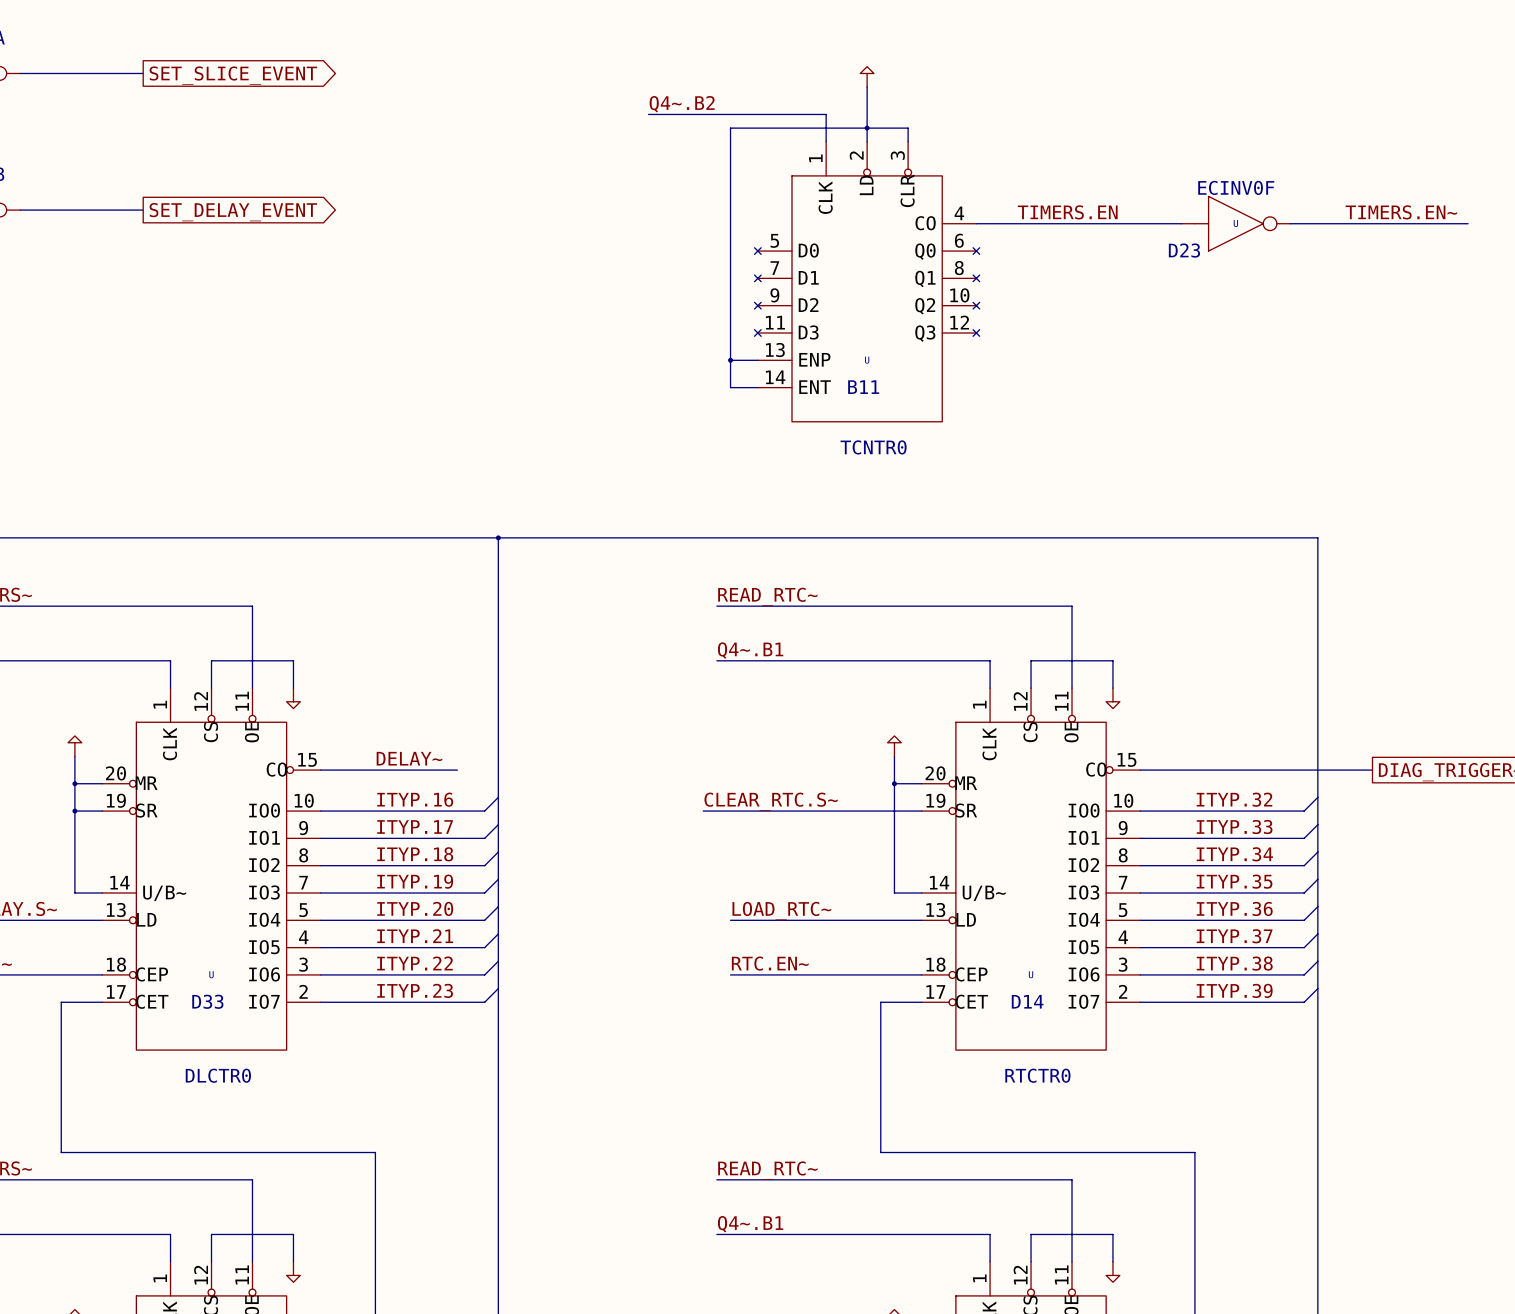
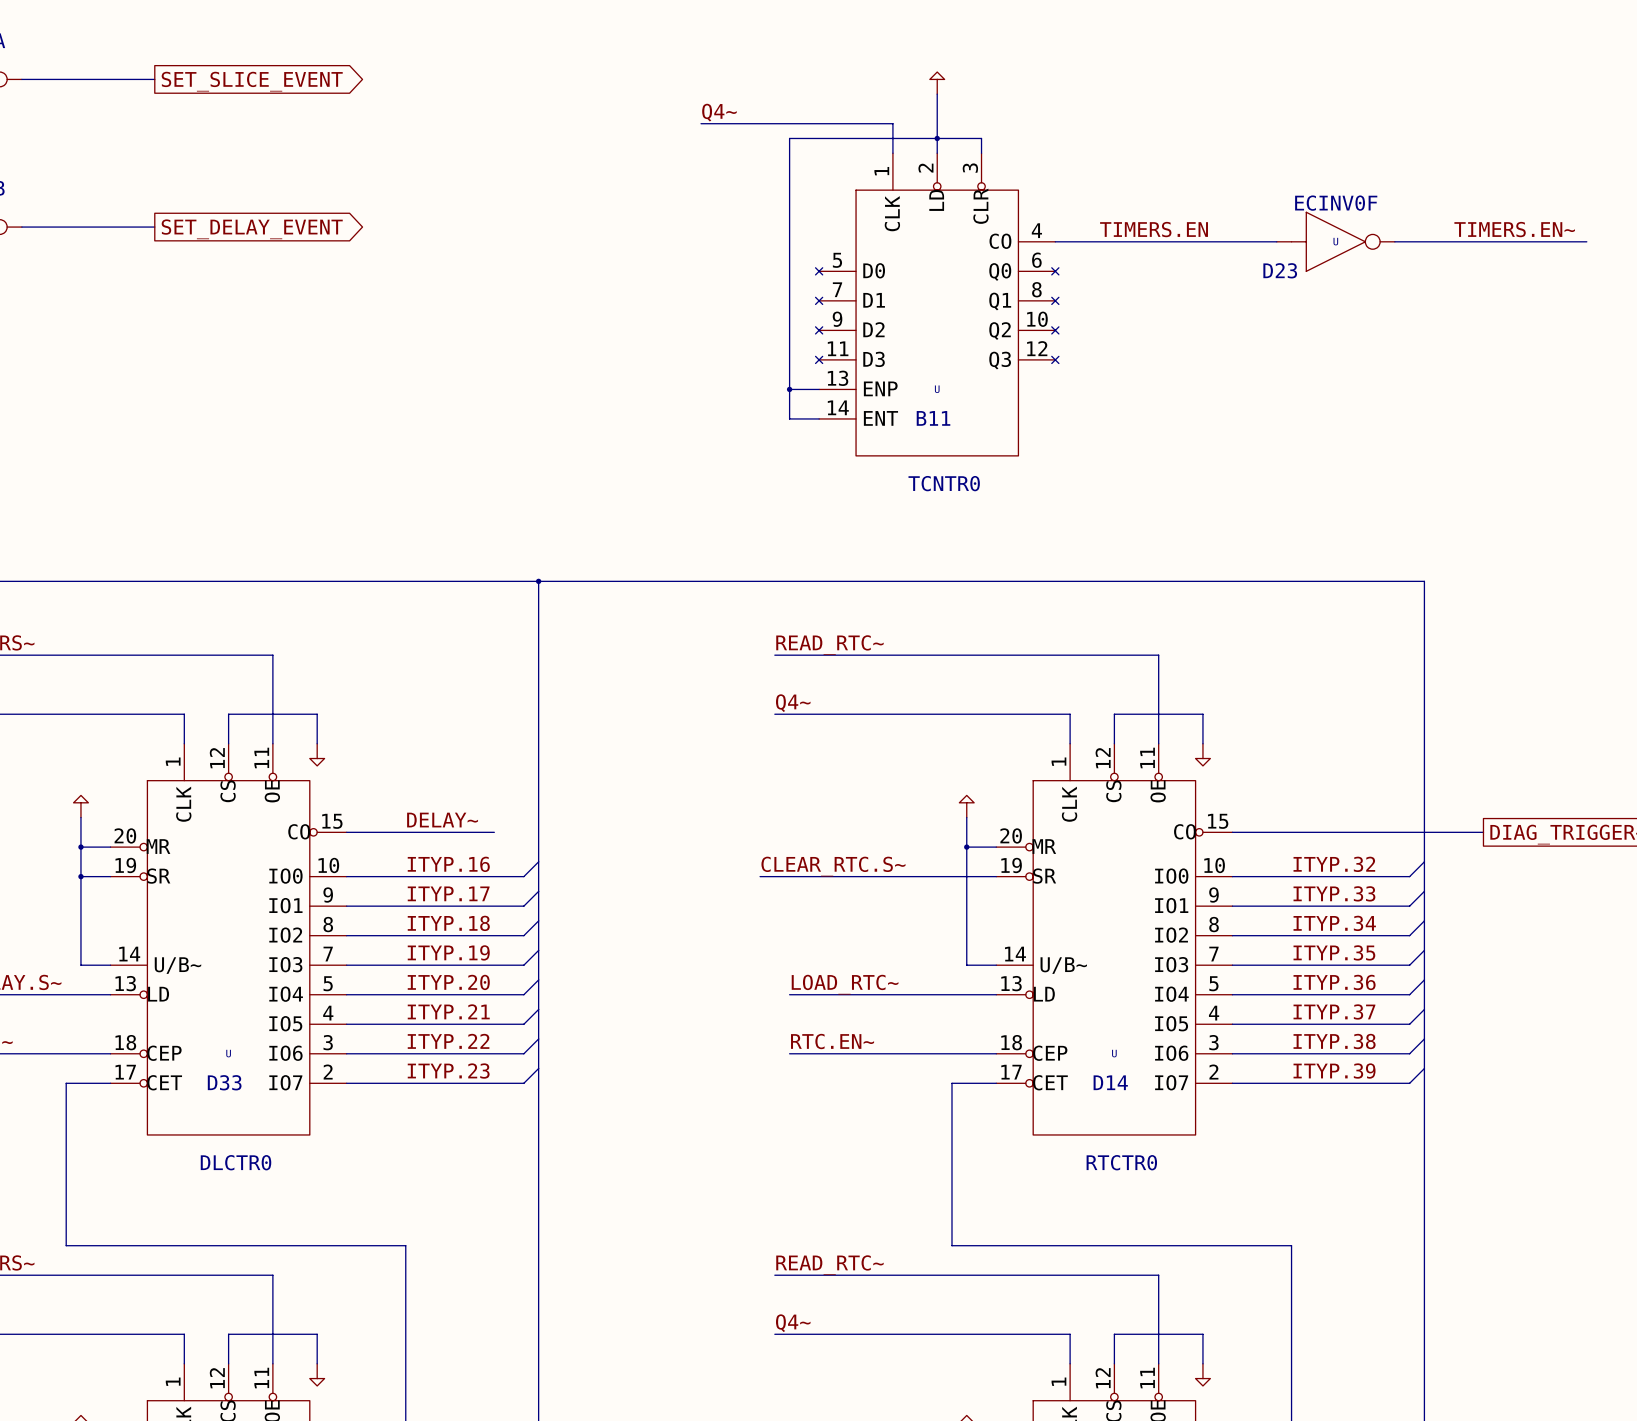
label: Q4~.B2 (682, 104) -> Q4~ (719, 112)
label: Q4~.B1 (750, 650) -> Q4~ (793, 703)
label: Q4~.B1 (750, 1224) -> Q4~ (793, 1323)

